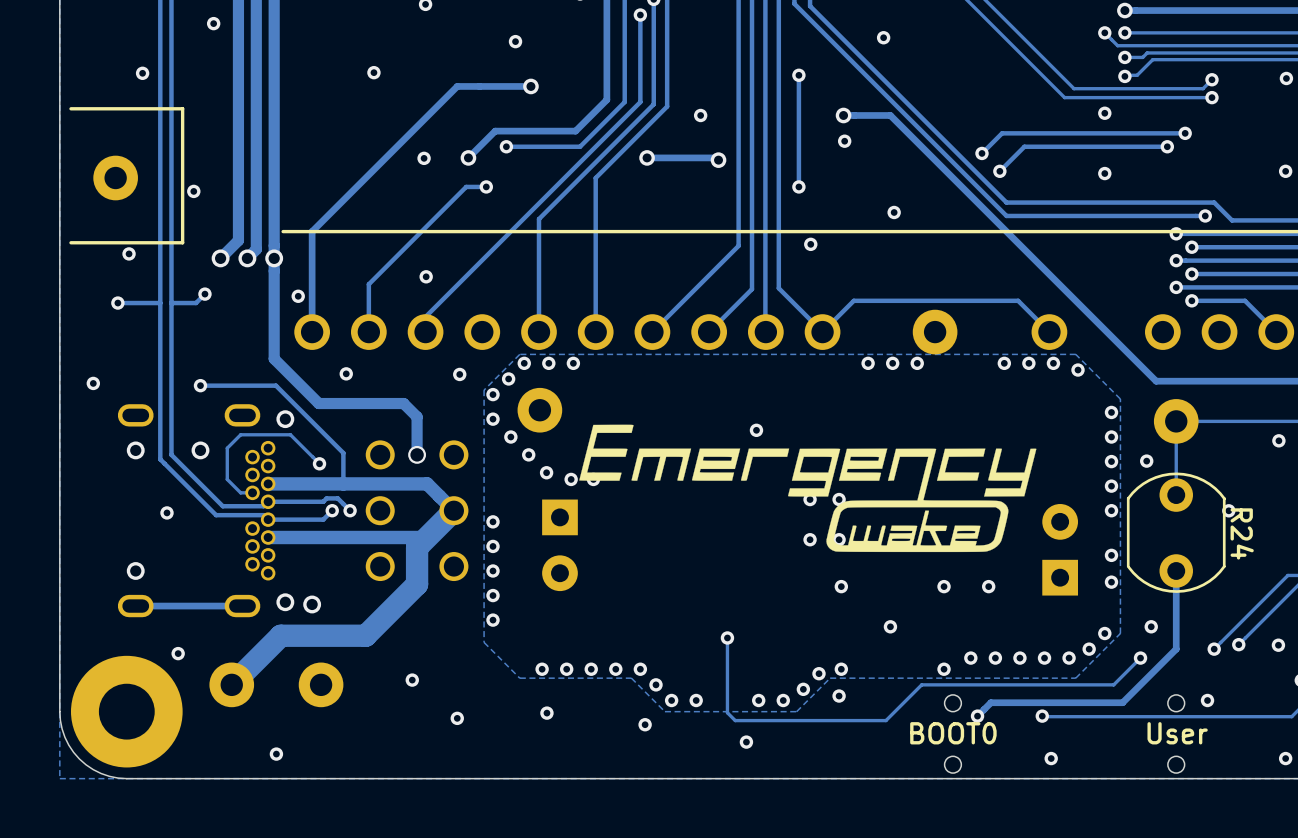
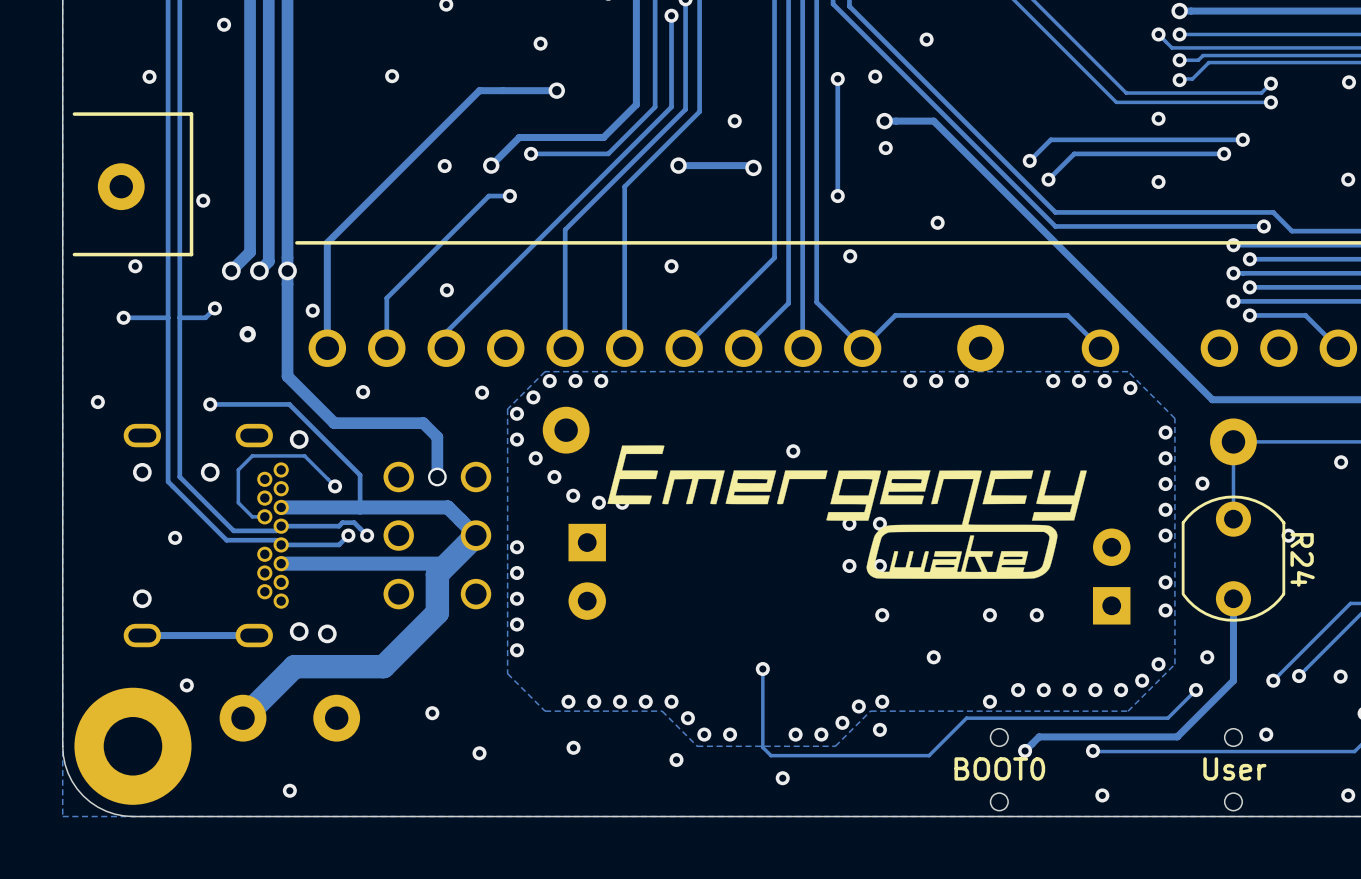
via: none -> (875, 76)
via: none -> (671, 266)
via: none -> (247, 334)

